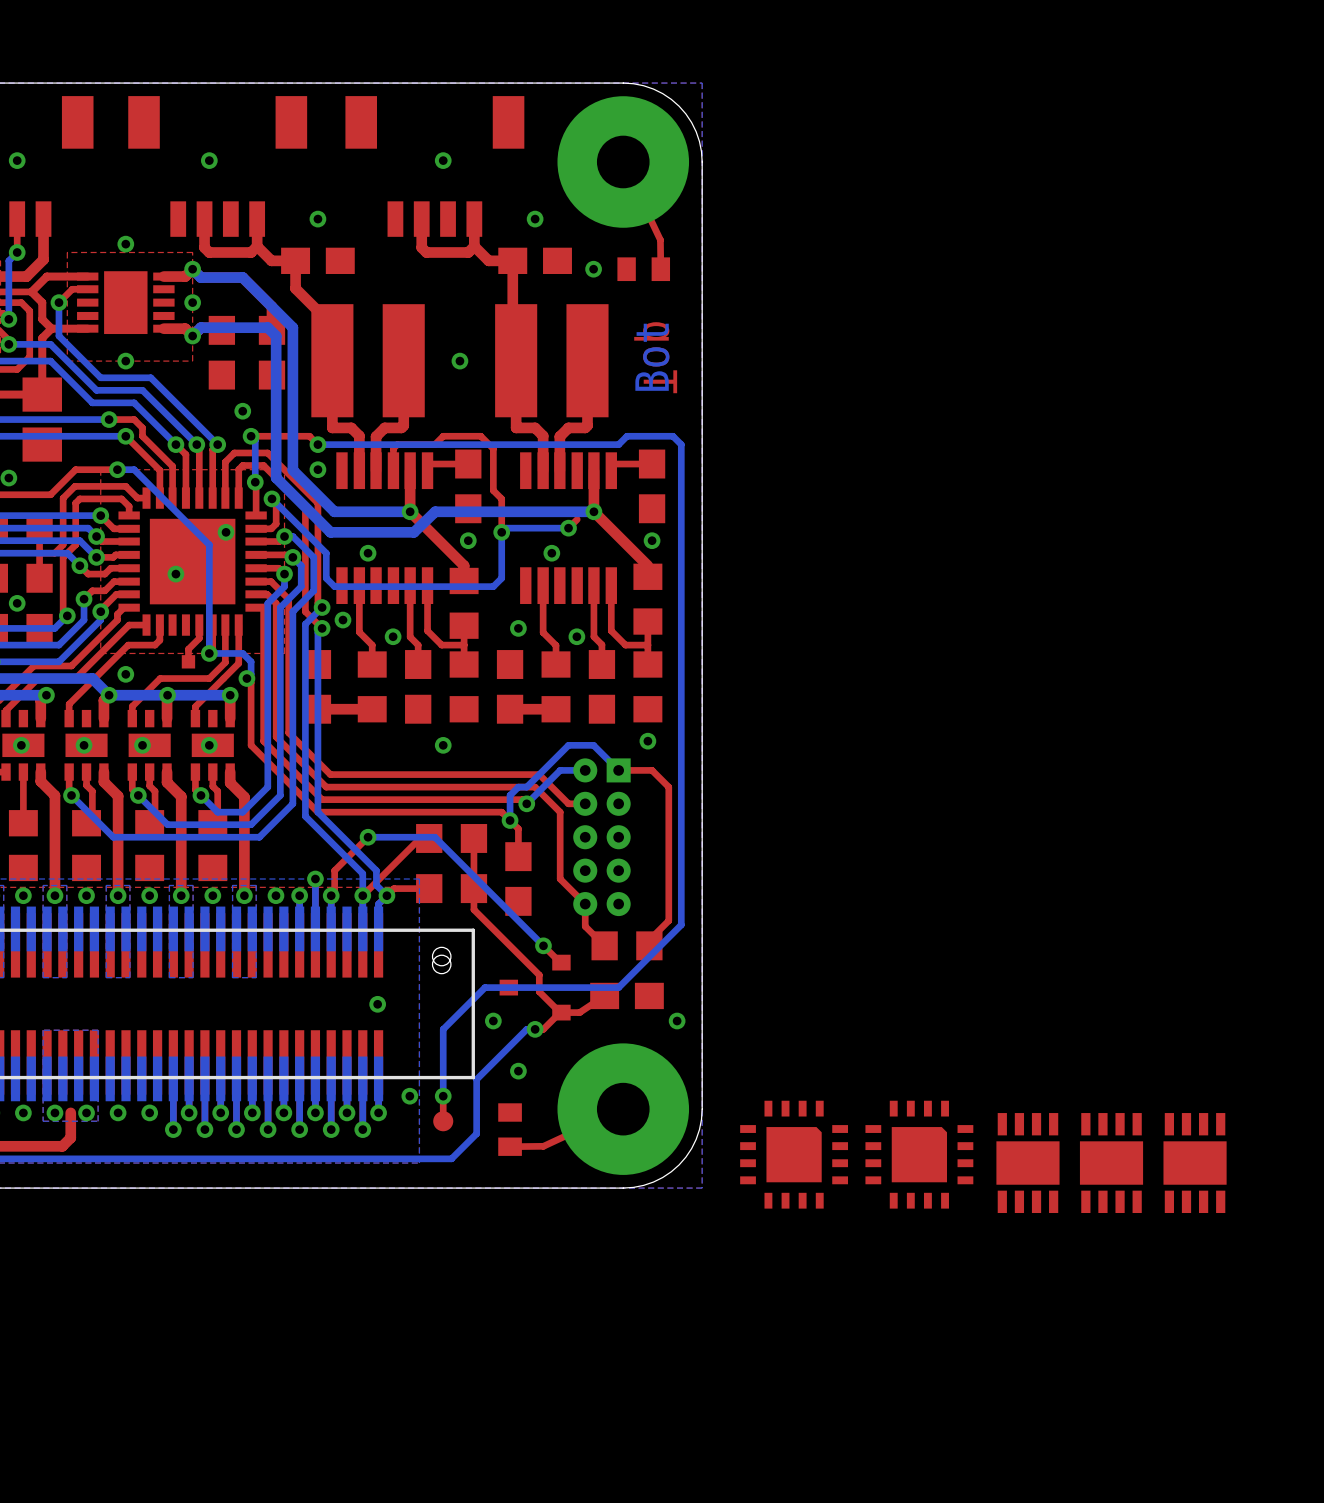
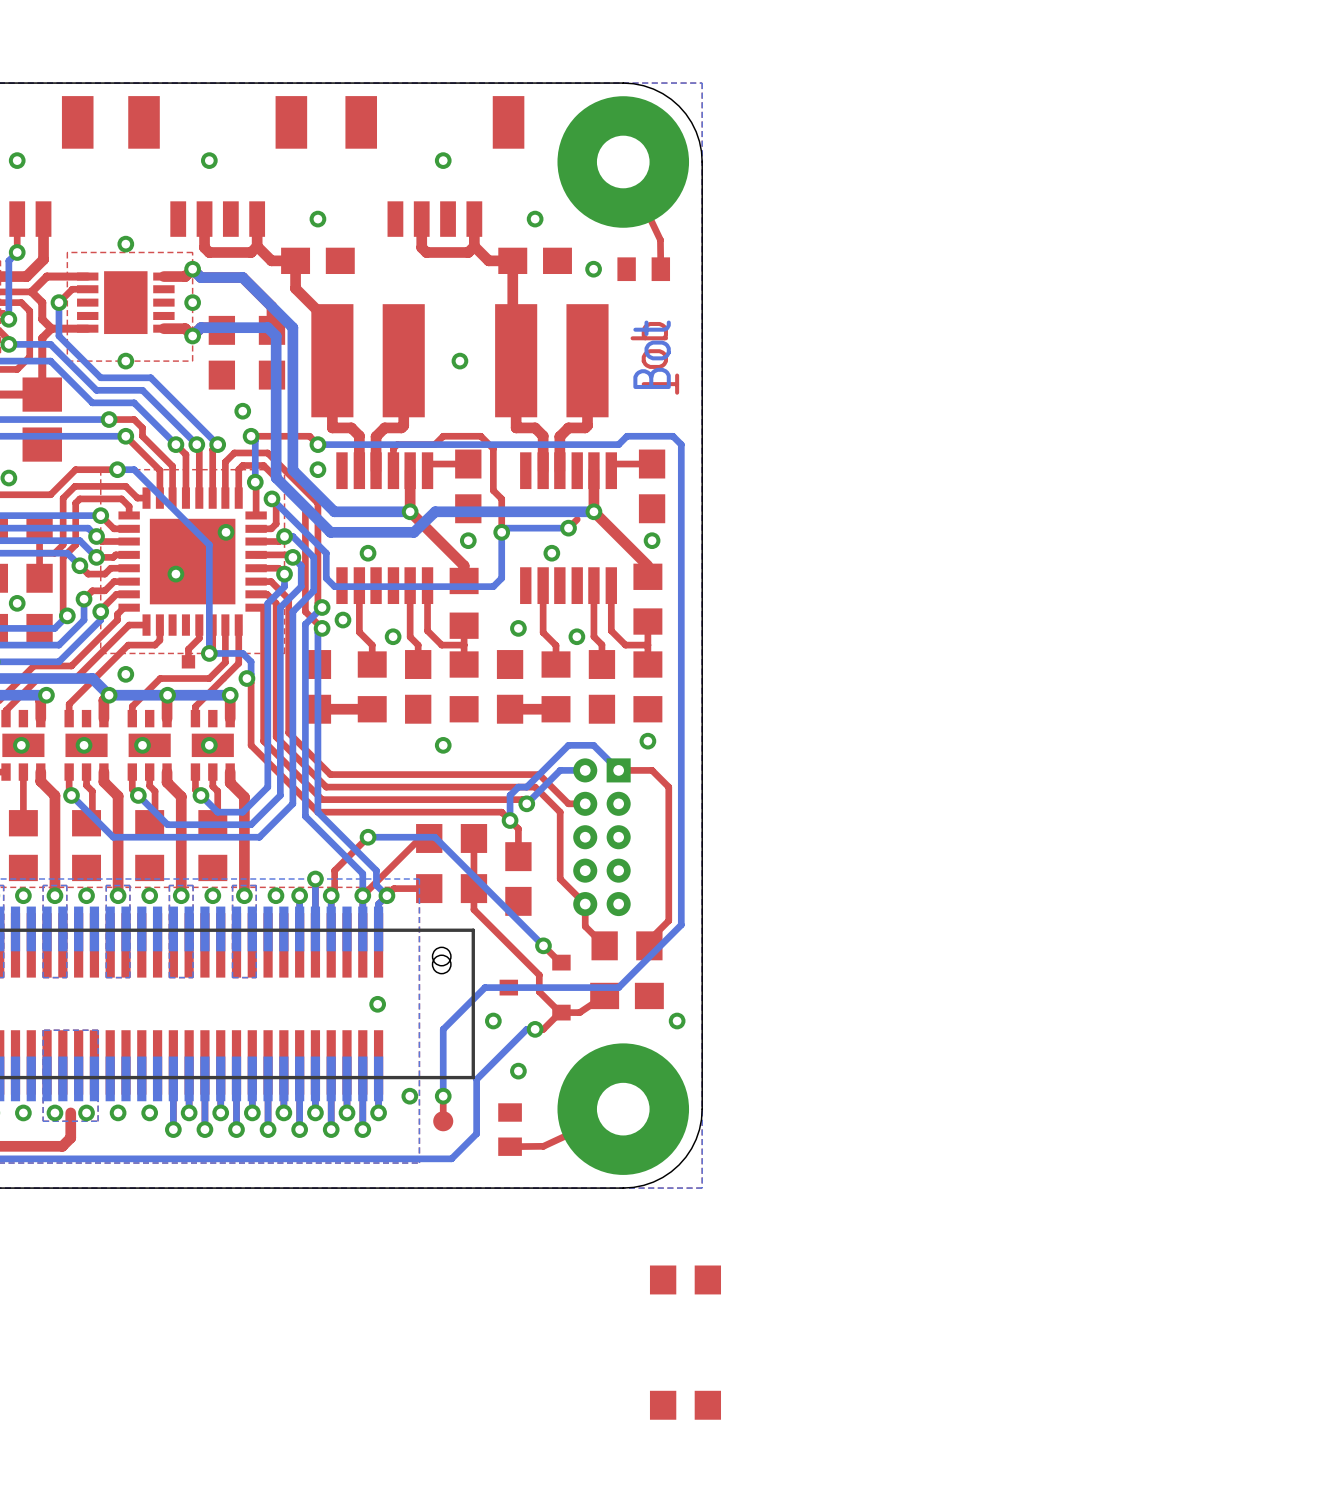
part: (794, 1154) -> none
part: (919, 1154) -> none
part: (1027, 1163) -> none
part: (1111, 1163) -> none
part: (1195, 1163) -> none
part: none -> (685, 1279)
part: none -> (685, 1405)

